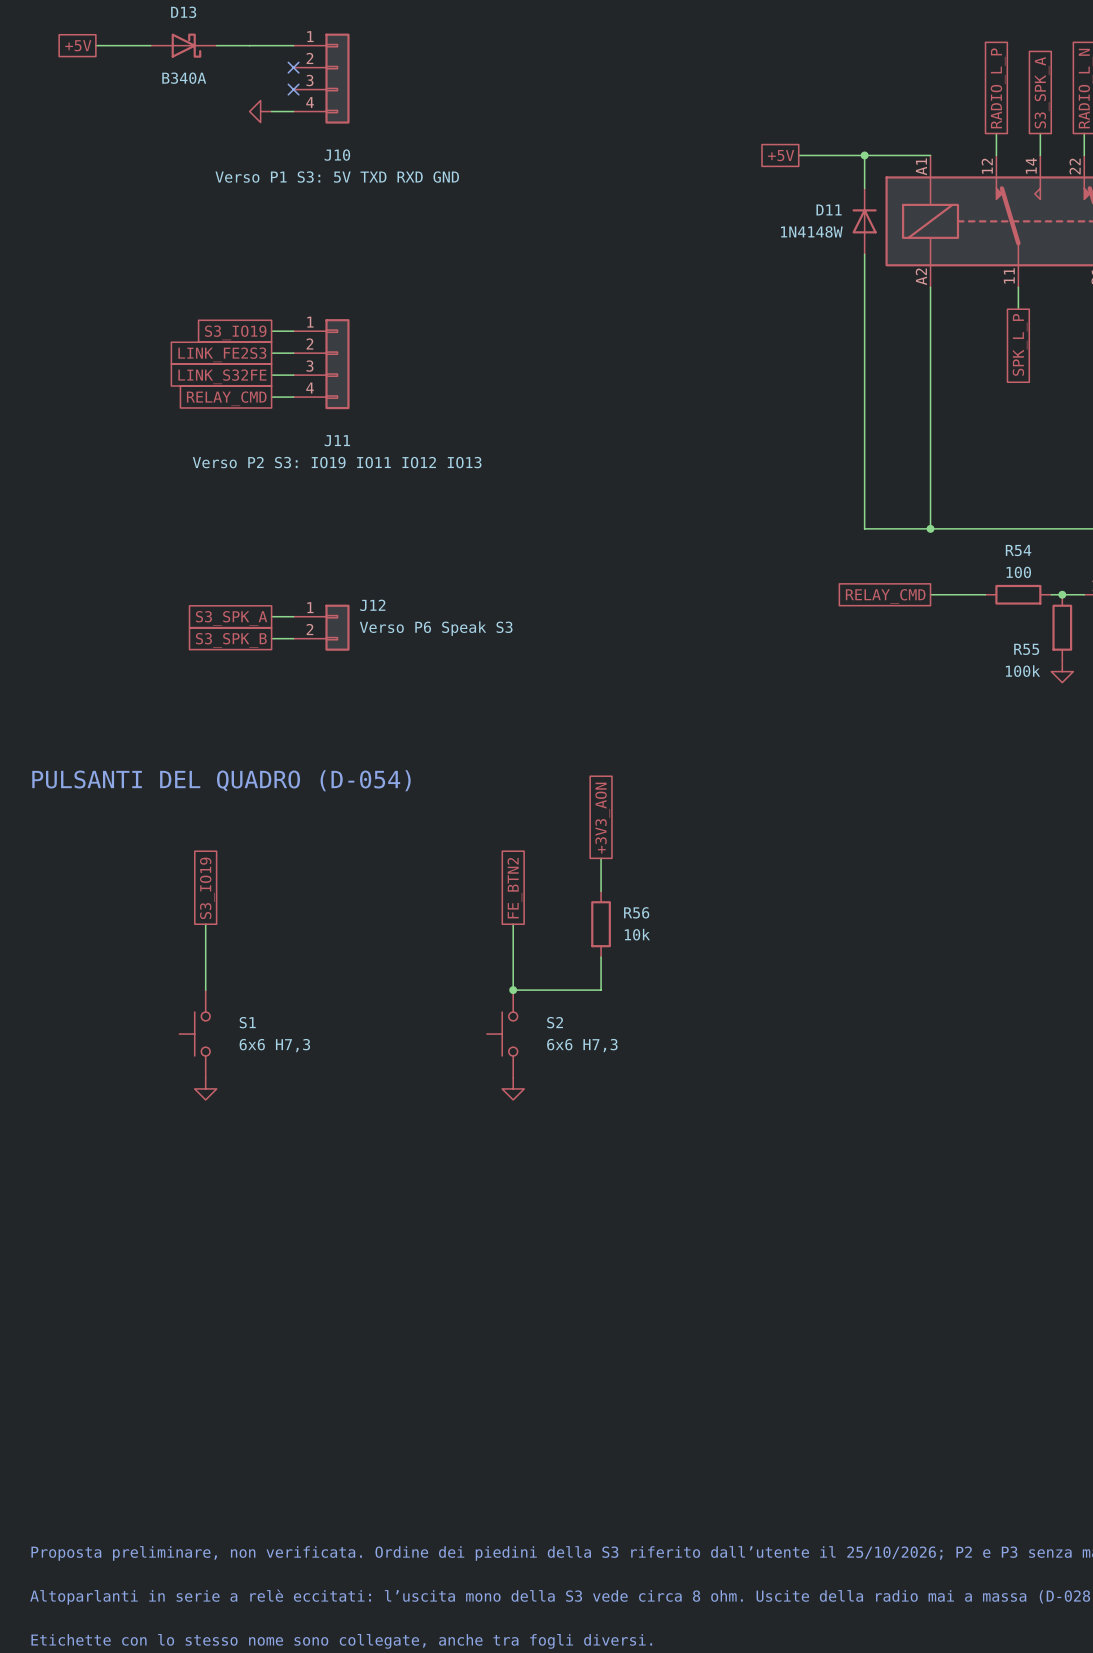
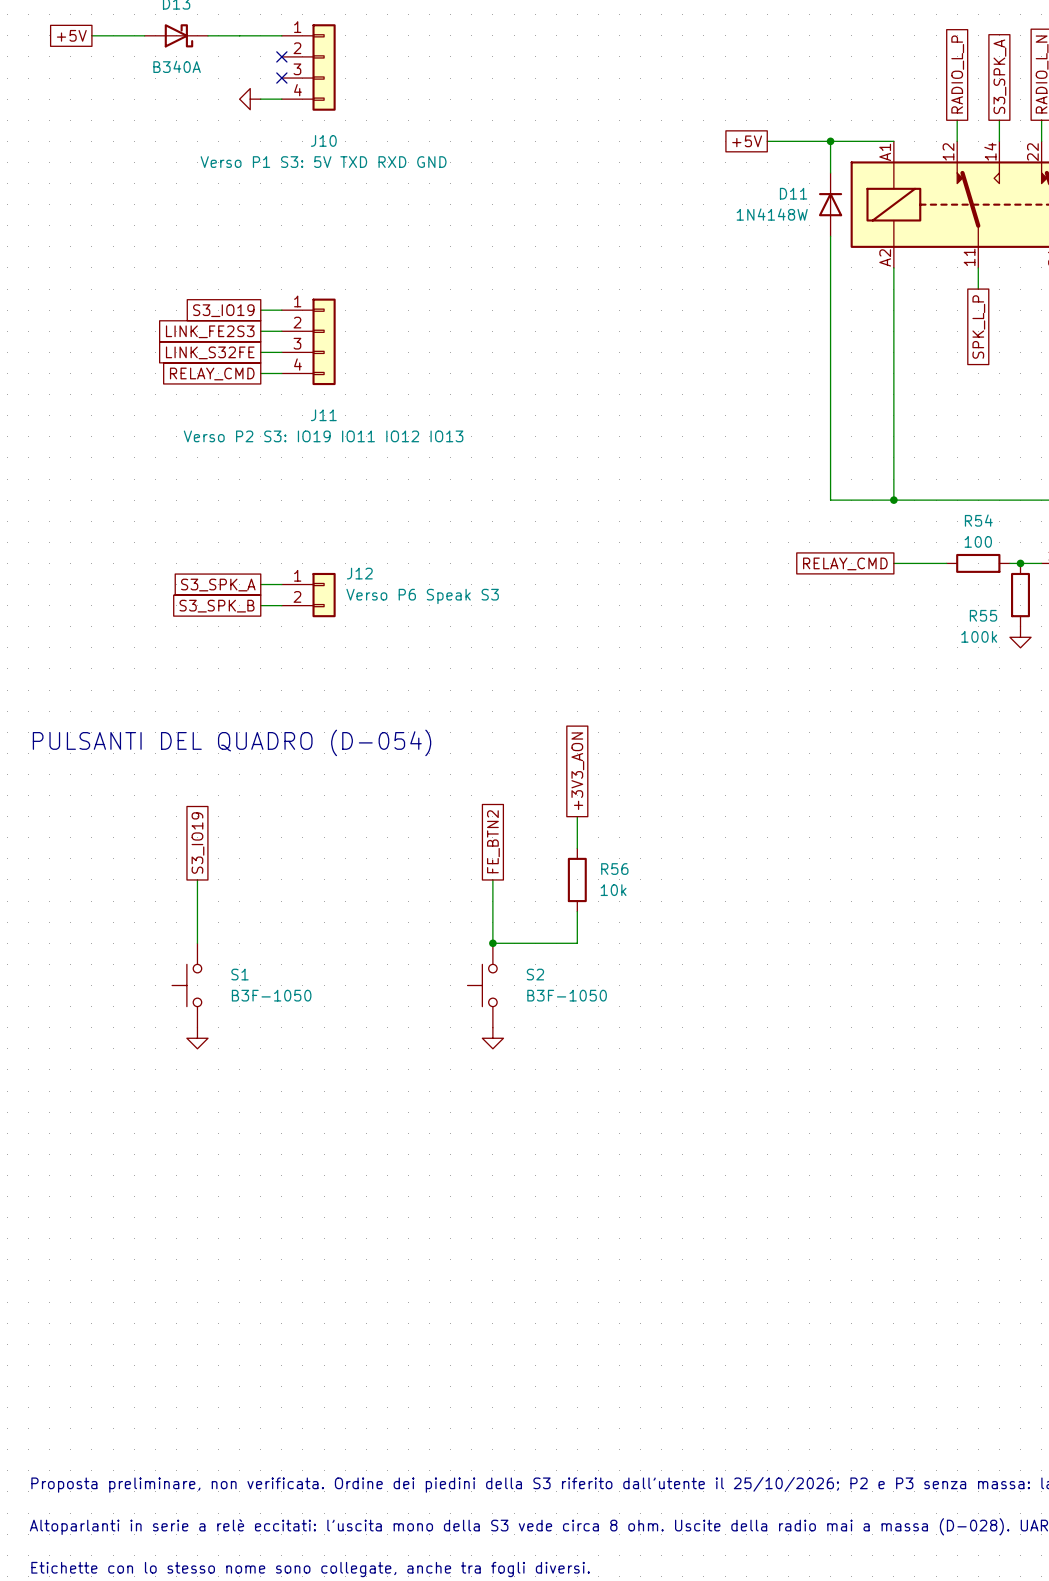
S1 value: 6x6 H7,3 (274, 1045) -> B3F-1050 (271, 995)
S2 value: 6x6 H7,3 (582, 1045) -> B3F-1050 (567, 995)

